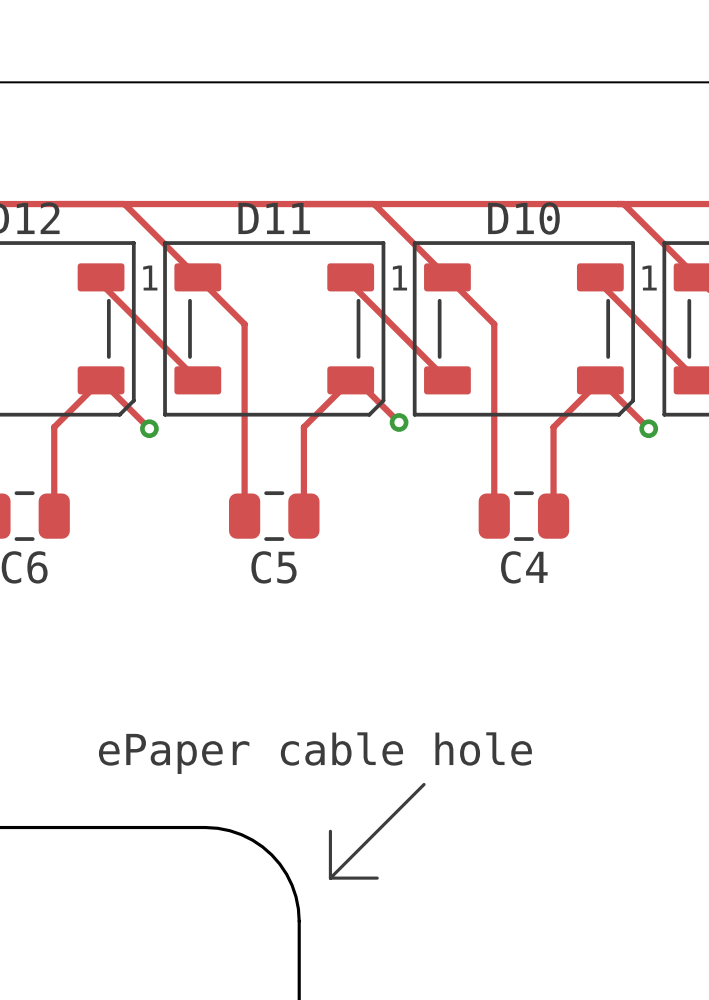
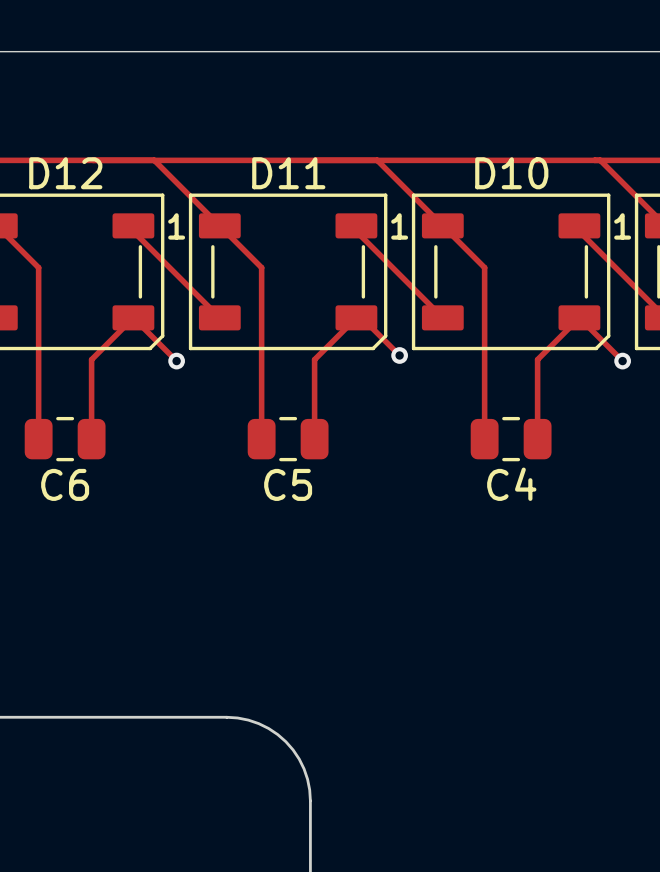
text: ePaper cable hole (315, 753) -> none
line: (424, 784) (330, 878) -> none
line: (330, 831) (330, 878) -> none
line: (330, 878) (377, 878) -> none

